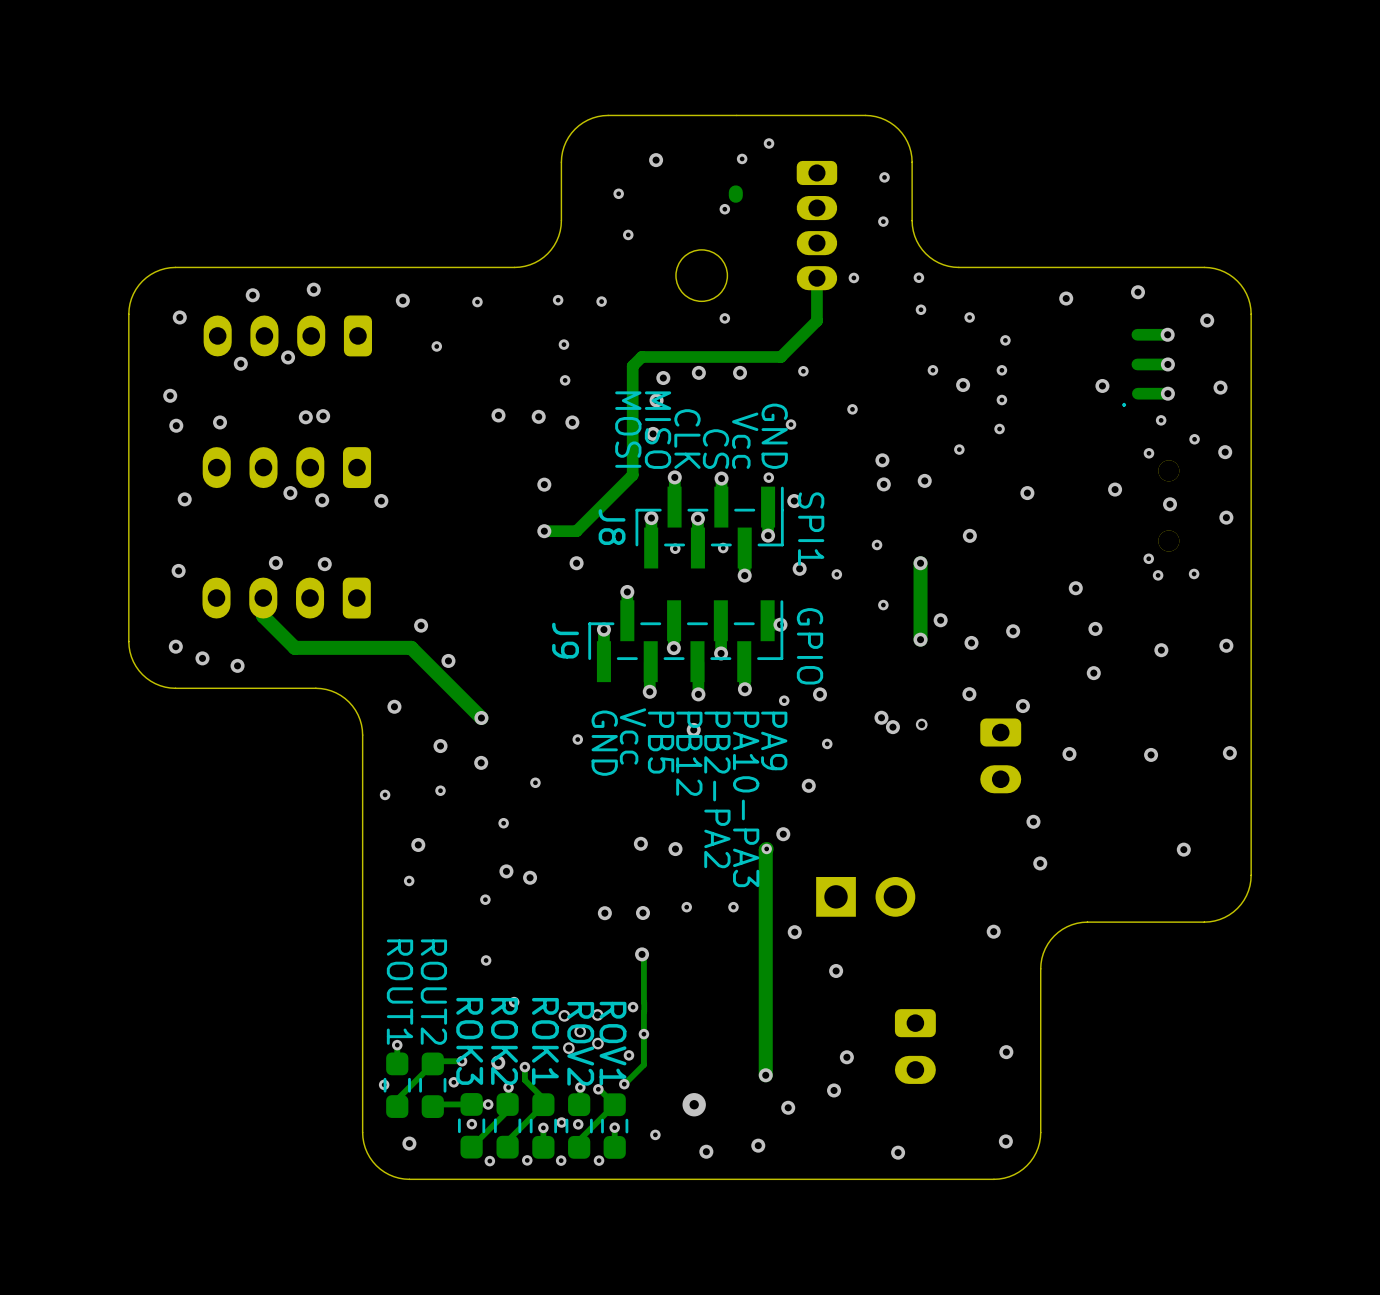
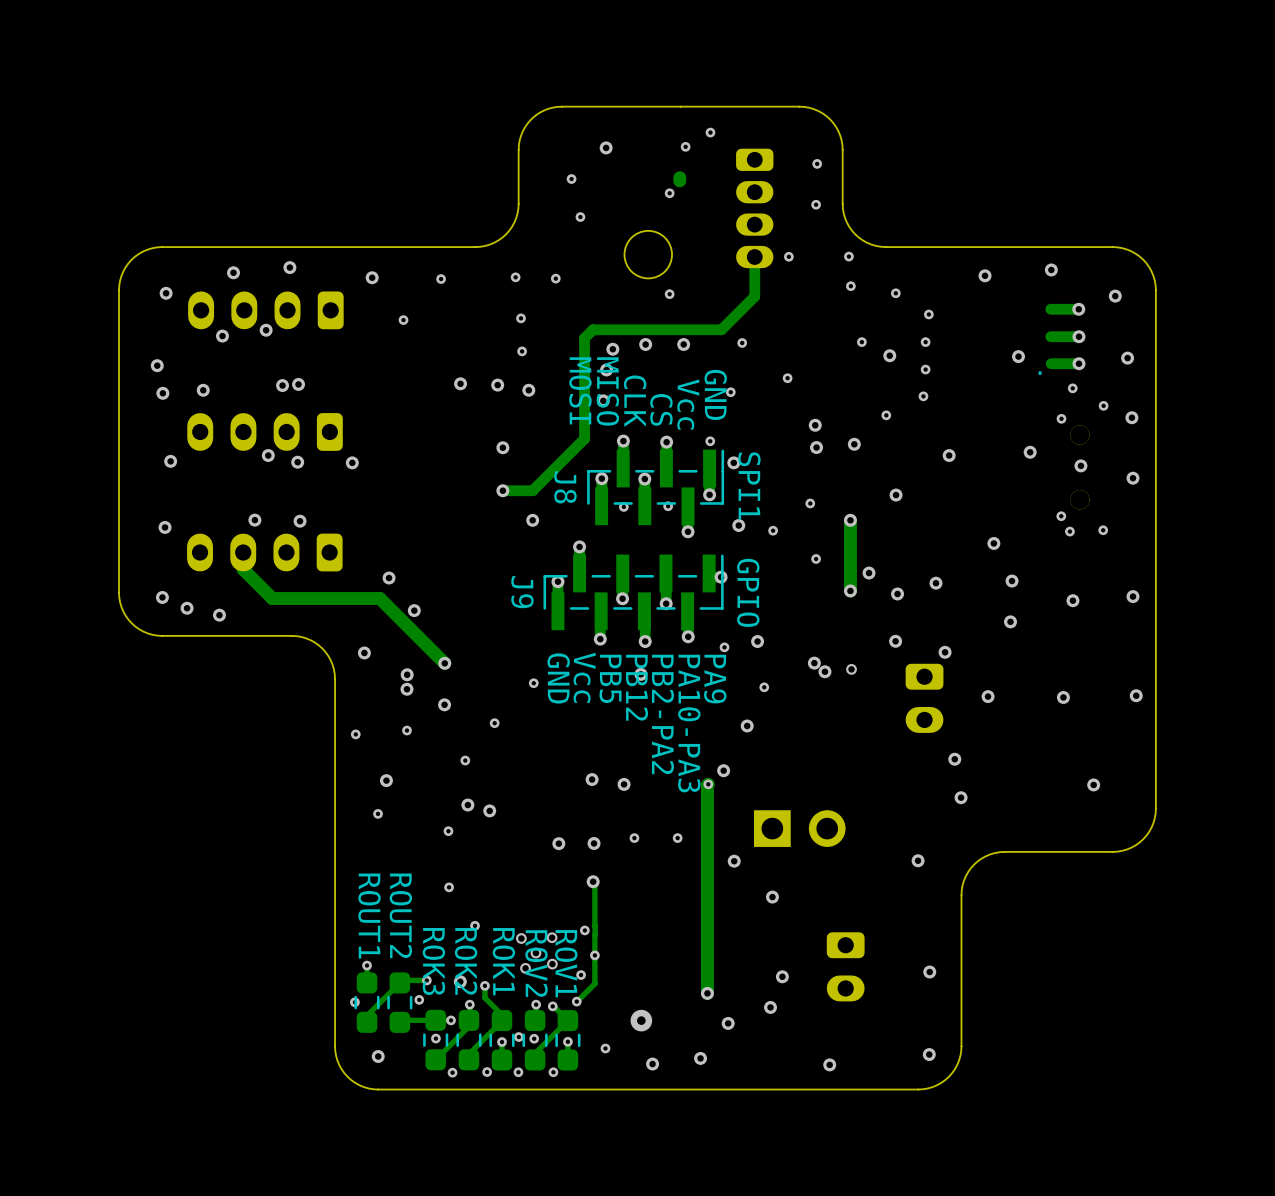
via: none -> (407, 674)

